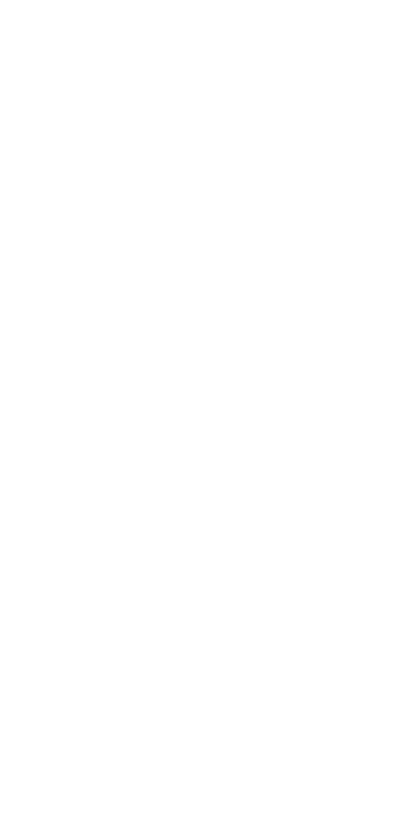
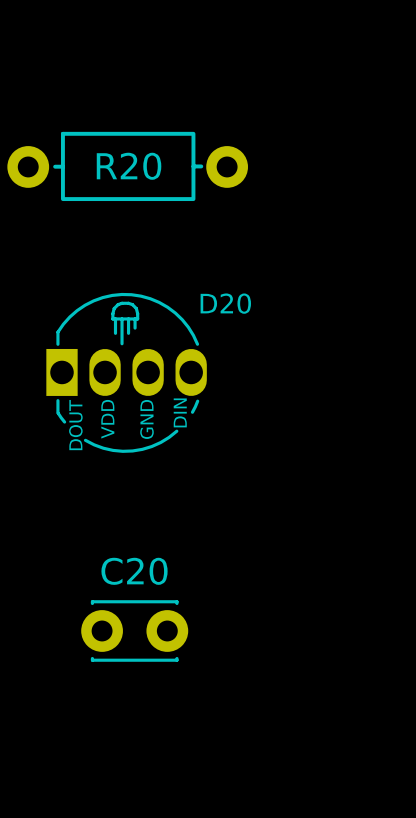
R20: none -> (127, 166)
D20: none -> (126, 372)
C20: none -> (134, 630)

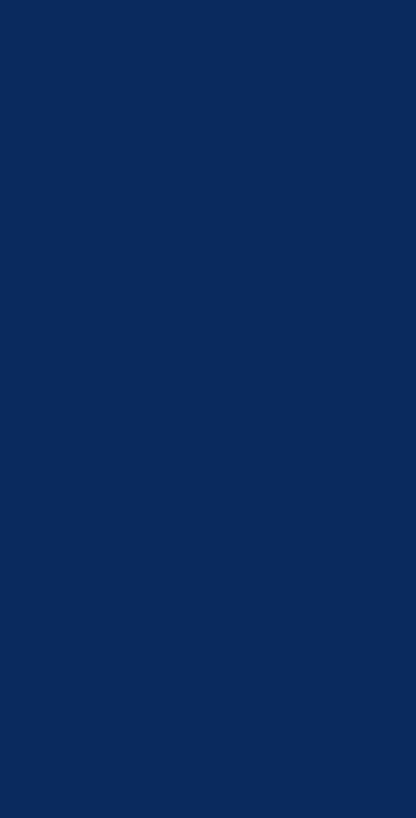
R20: (127, 166) -> none
D20: (126, 372) -> none
C20: (134, 630) -> none

